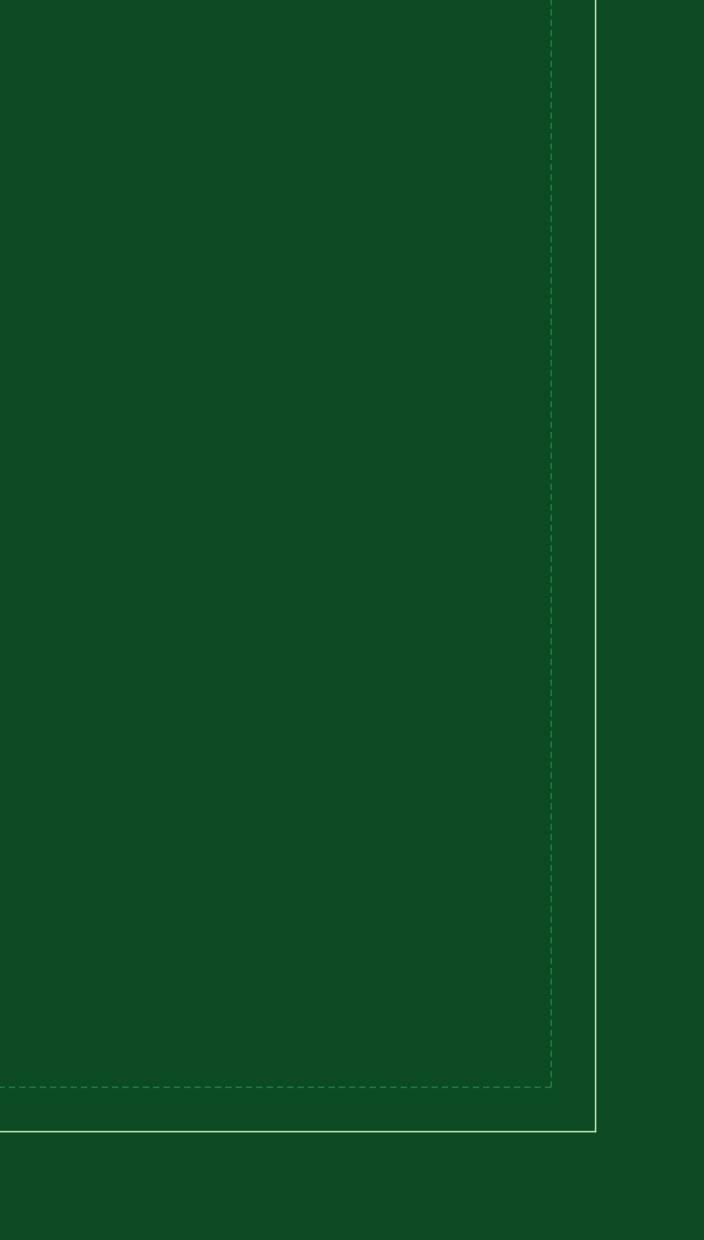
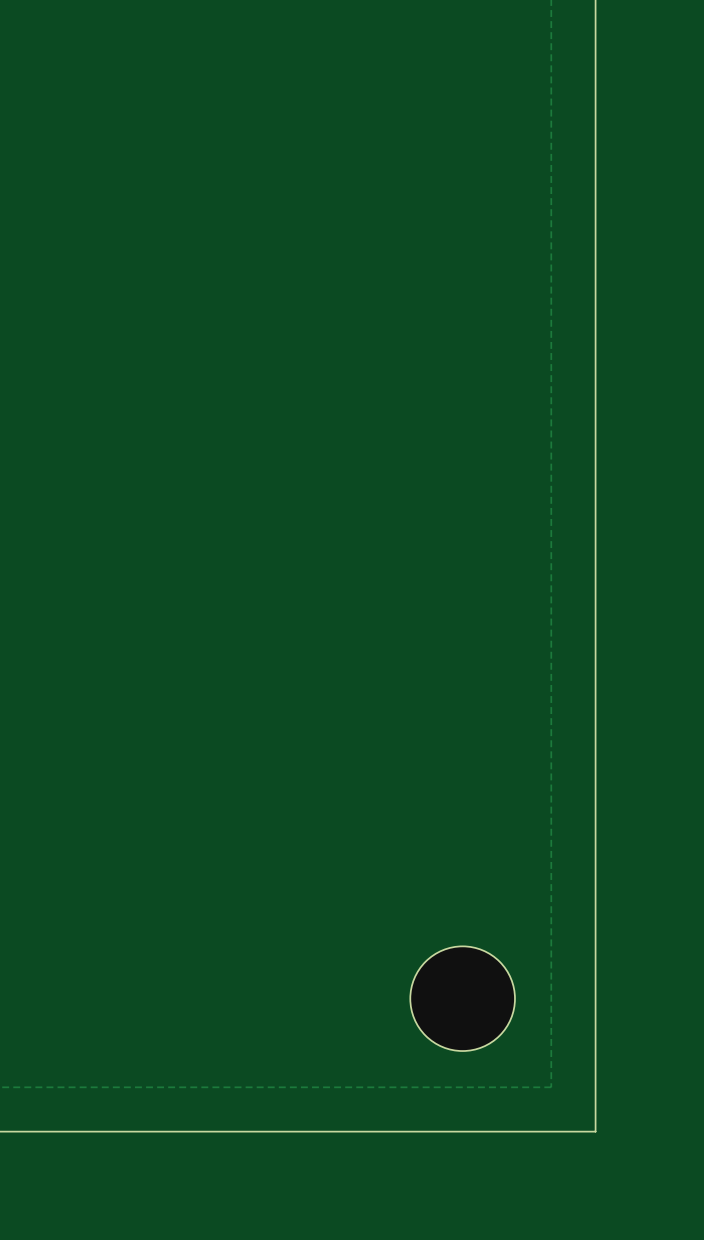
hole: none -> (462, 998)

